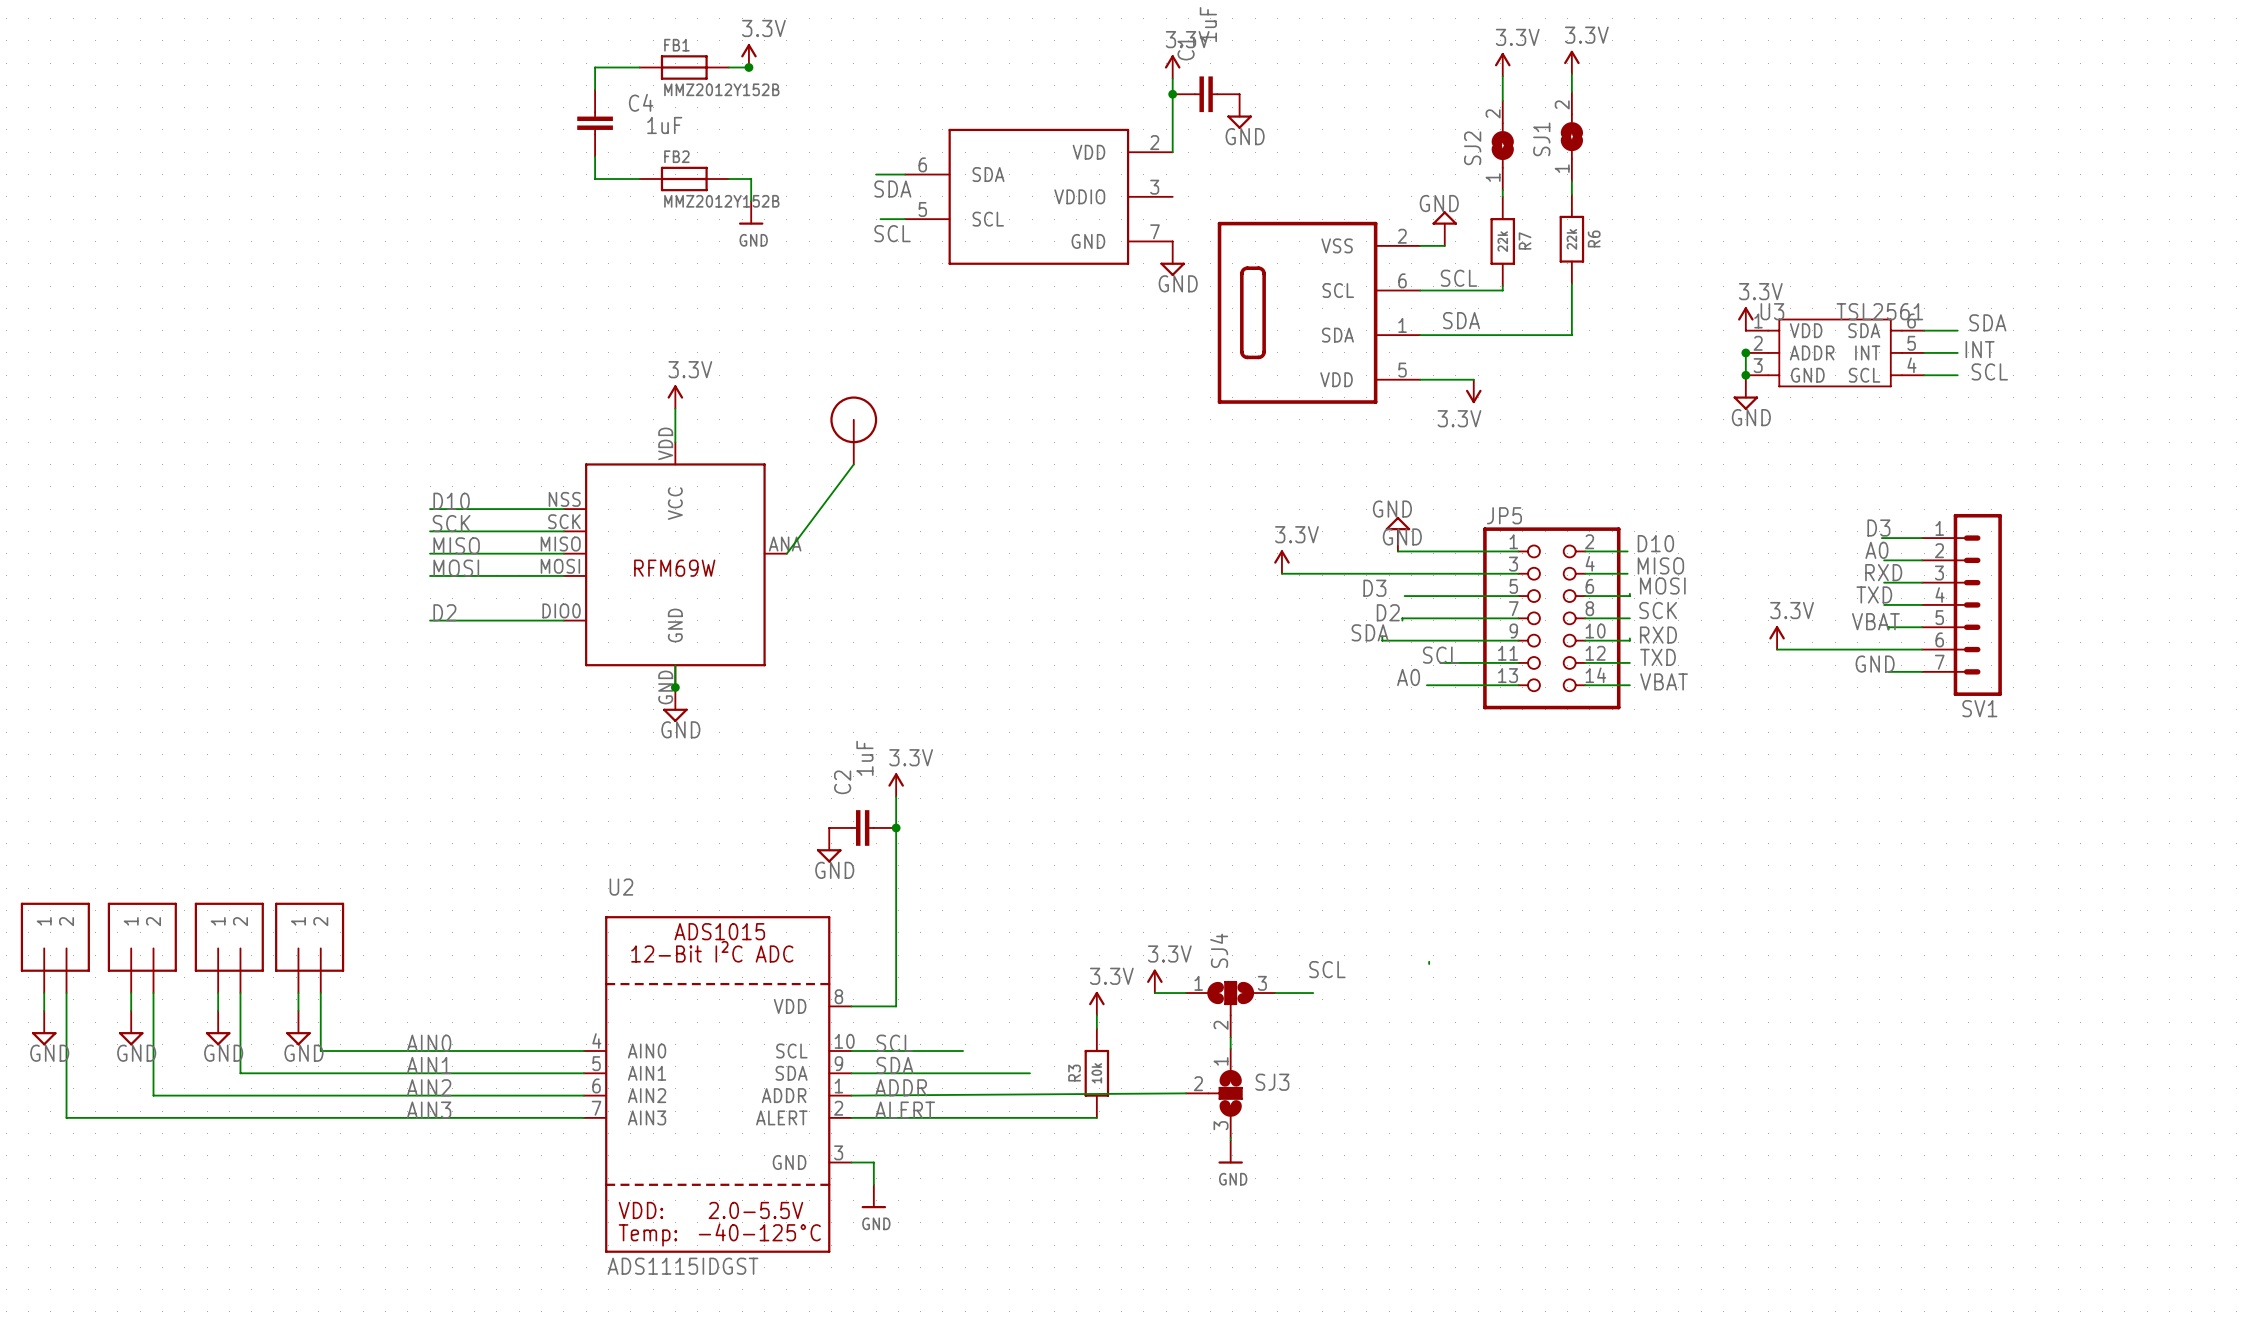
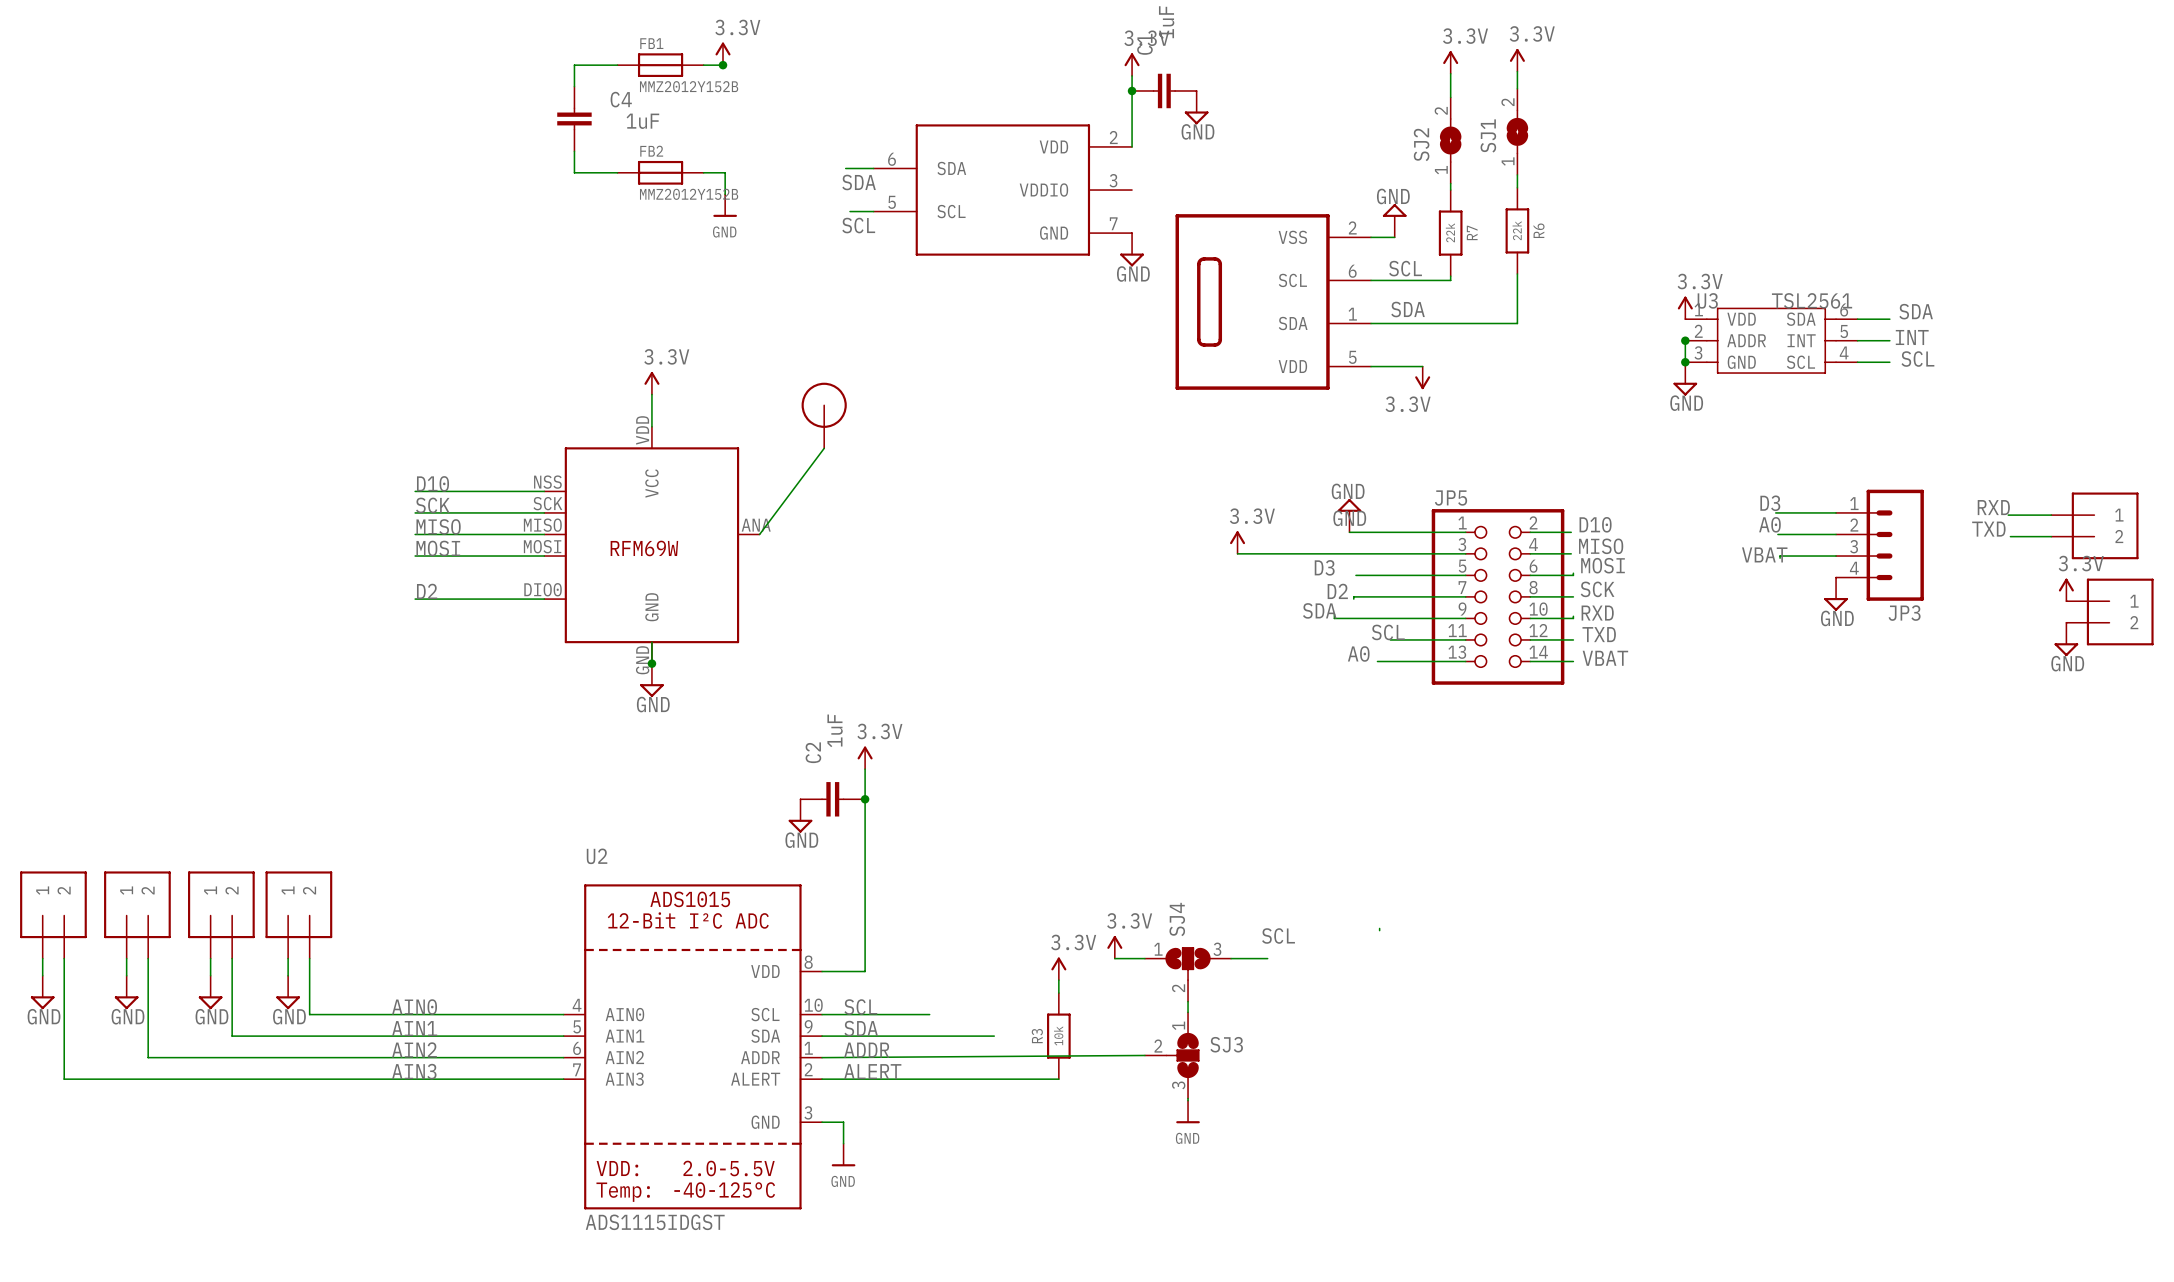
label position: D3 (1878, 528) -> D3 (1770, 503)
wire: none -> (1775, 512) (1836, 512)
wire: none -> (2008, 515) (2051, 515)
wire: (1881, 538) (1922, 538) -> none
part: none -> (2094, 525)
label position: A0 (1876, 550) -> A0 (1769, 524)
wire: none -> (1777, 534) (1836, 534)
wire: none -> (2010, 536) (2051, 536)
wire: (1884, 560) (1922, 560) -> none
JP3: none -> (1879, 545)
label position: RXD (1883, 572) -> RXD (1993, 507)
wire: none -> (1836, 556) (1780, 556) (1780, 558)
wire: (1884, 582) (1922, 582) -> none
label position: TXD (1874, 594) -> TXD (1988, 529)
wire: (1884, 604) (1922, 604) -> none
SV1: (1961, 604) -> none
power symbol: none -> 3.3V (2066, 589)
power symbol: none -> GND (1836, 594)
label position: VBAT (1875, 621) -> VBAT (1764, 554)
wire: (1922, 627) (1888, 627) (1888, 629) -> none
part: none -> (2109, 611)
power symbol: 3.3V (1777, 637) -> none
wire: (1777, 649) (1922, 649) -> none
power symbol: none -> GND (2066, 639)
label: GND (1875, 664) -> none
wire: (1888, 671) (1922, 671) -> none

